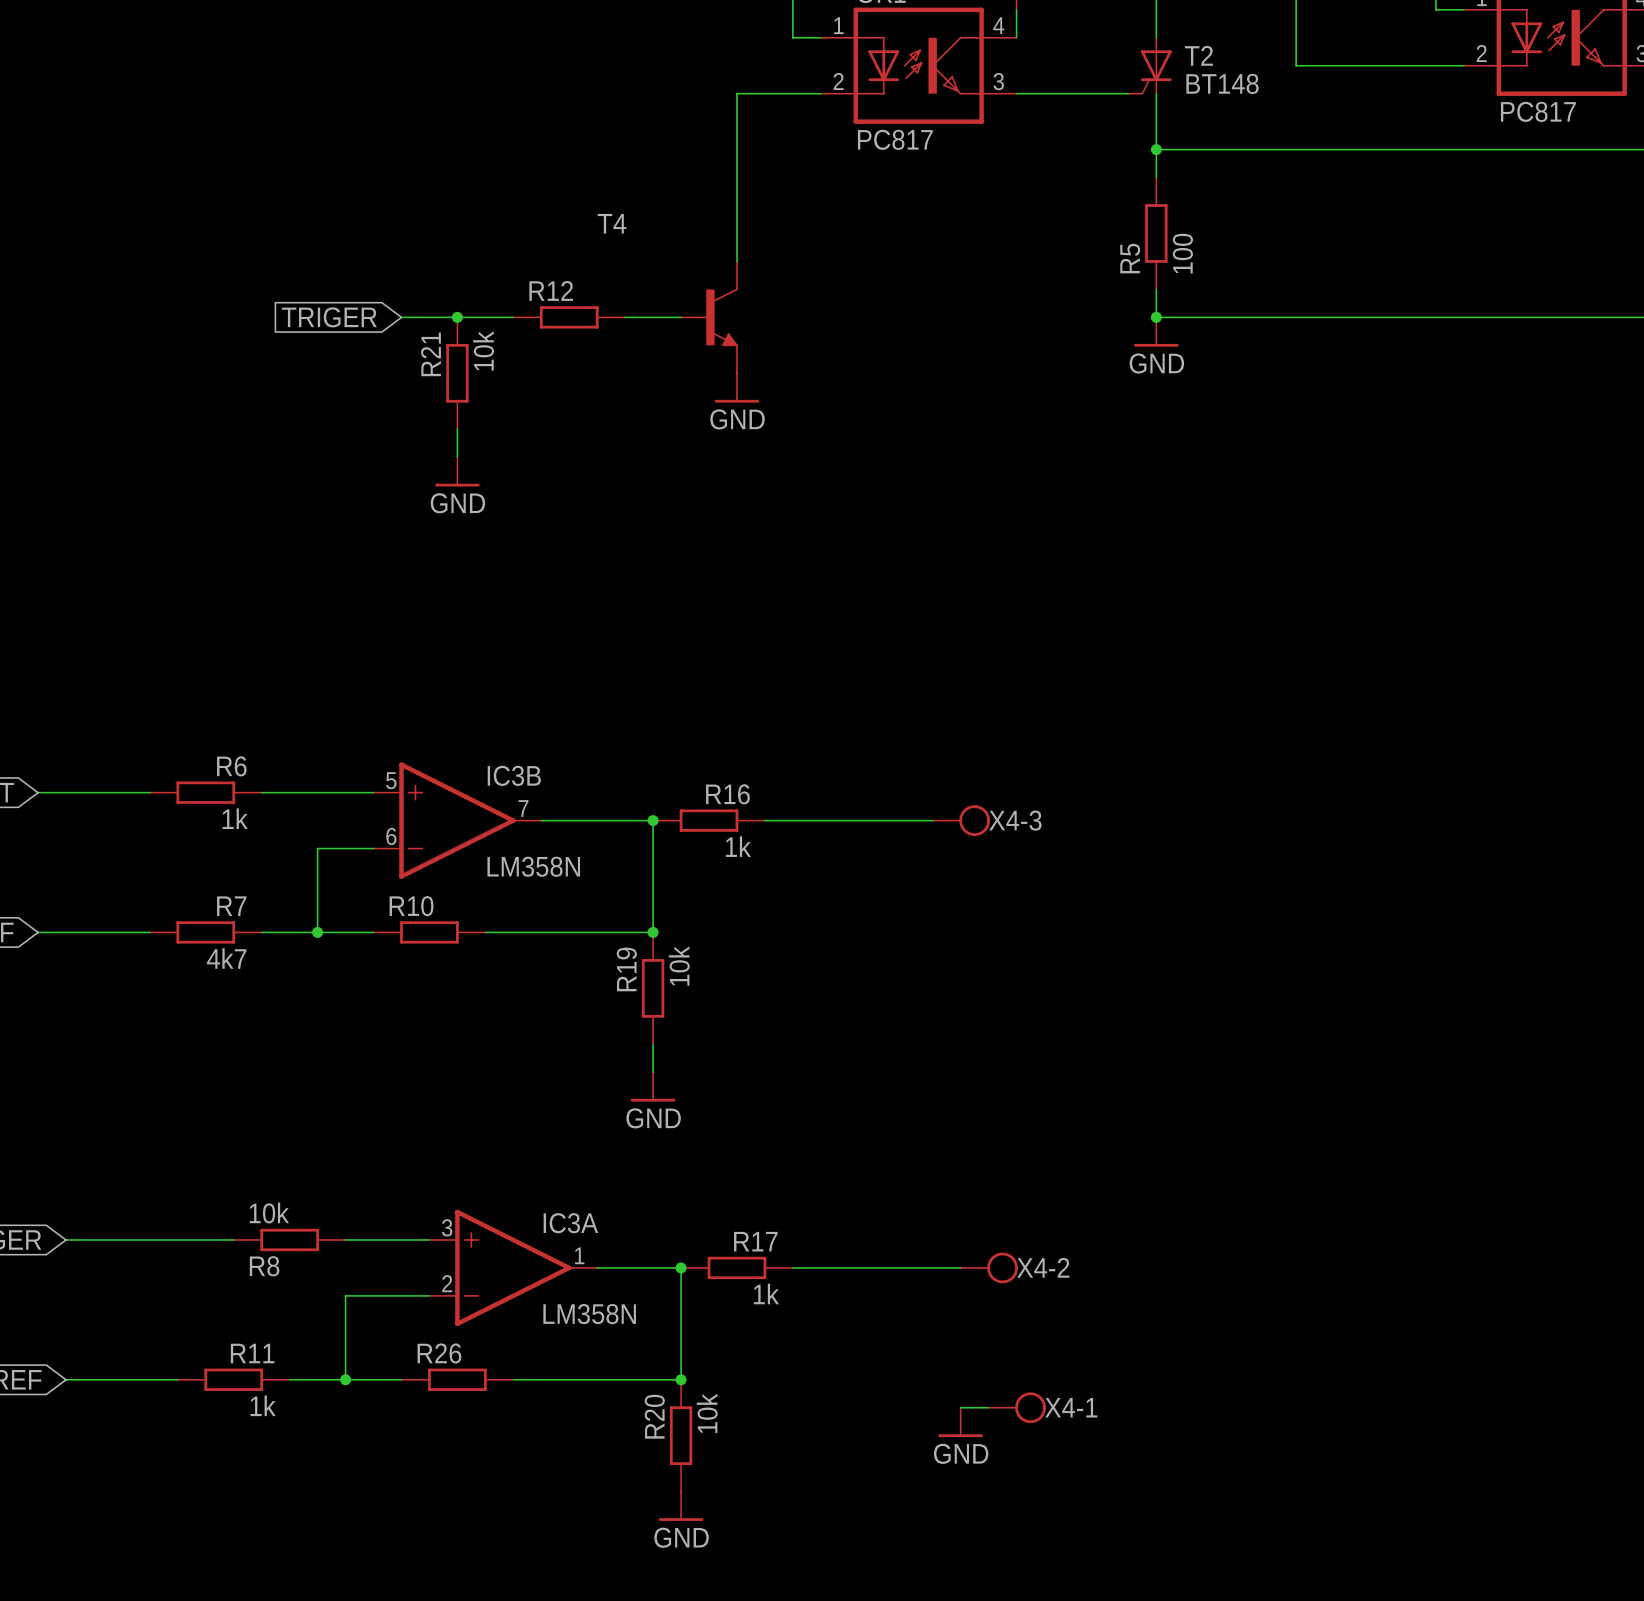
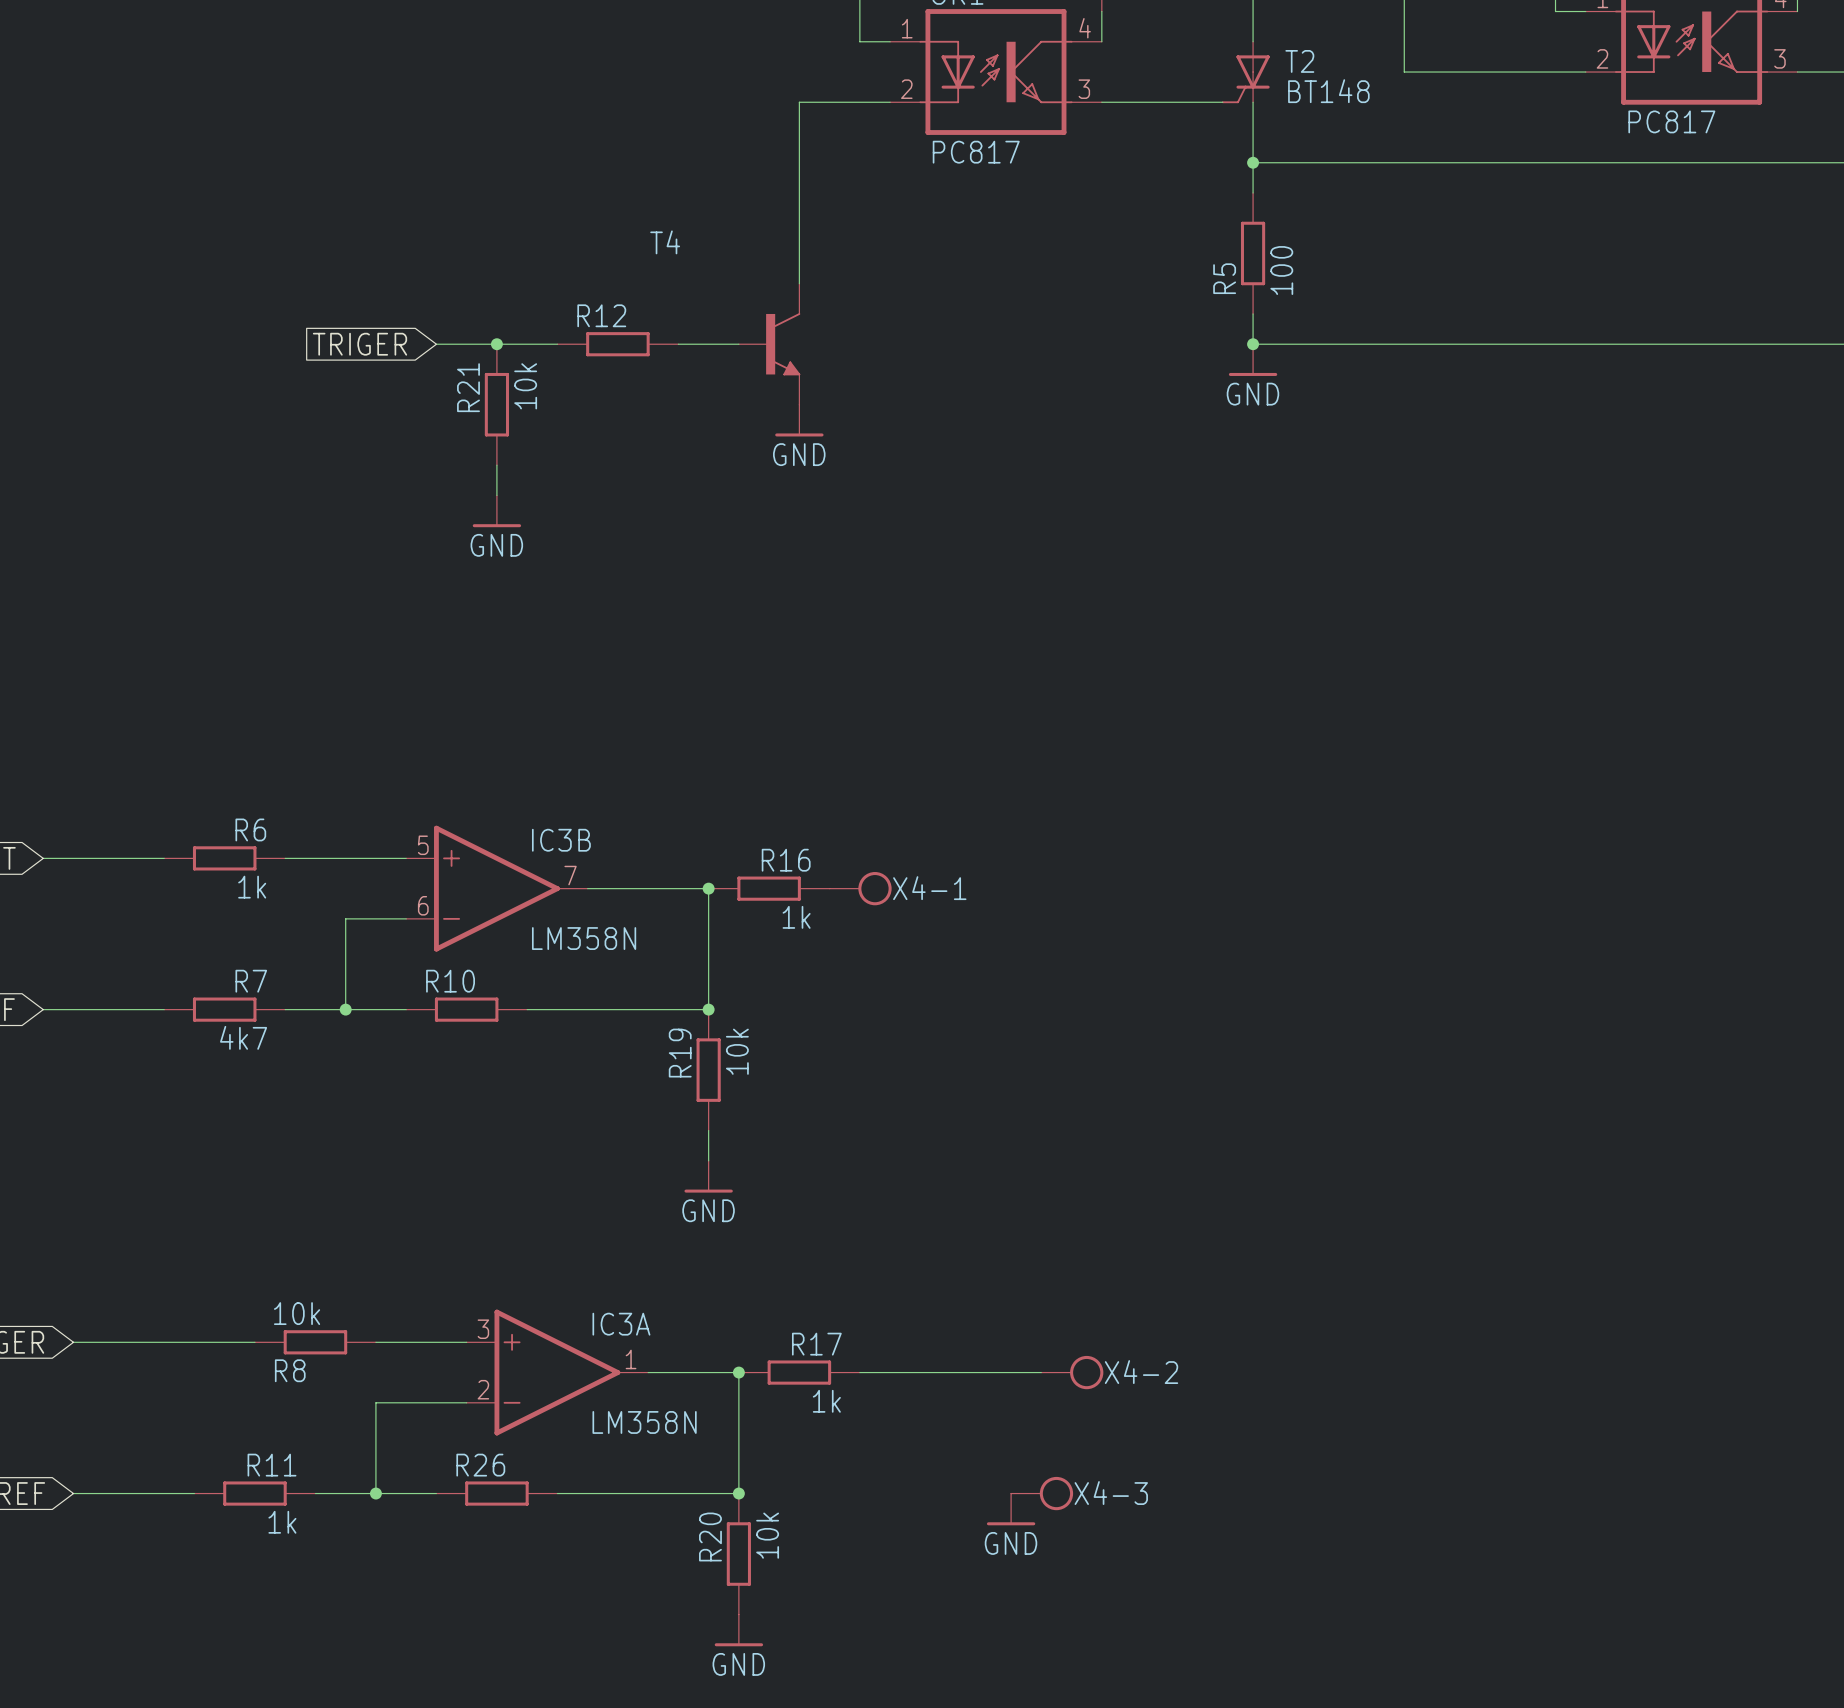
wire: (764, 820) (932, 820) -> none
X4-3 position: (961, 820) -> (1042, 1493)
wire: (960, 1407) (988, 1407) -> none
X4-1 position: (1017, 1407) -> (860, 888)
power symbol position: GND (960, 1422) -> GND (1011, 1509)

